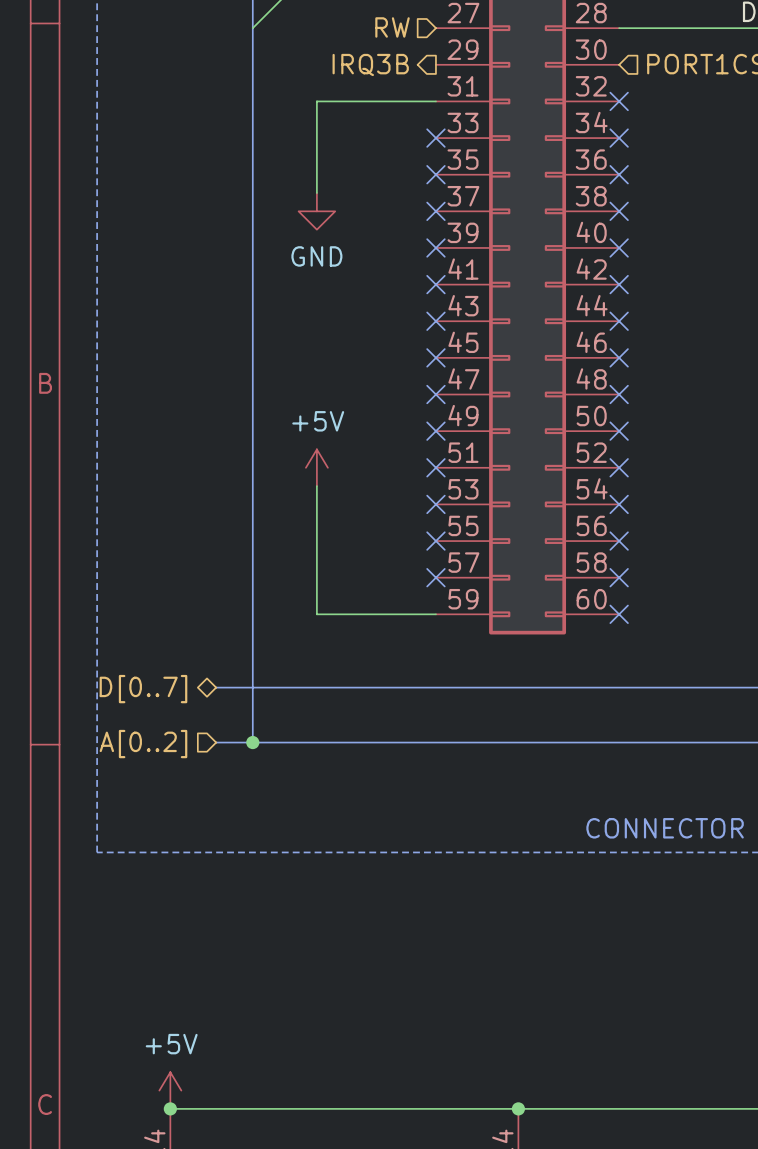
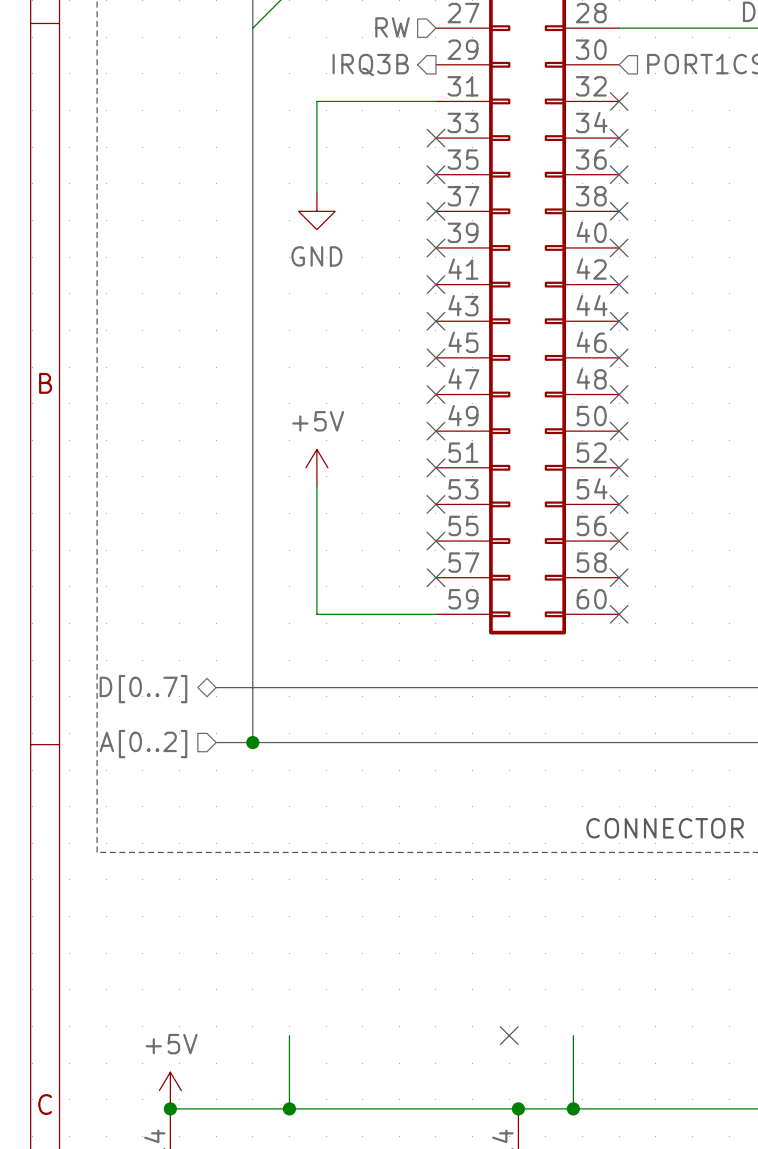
wire: none -> (289, 1035) (289, 1108)
no-connect mark: none -> (509, 1035)
wire: none -> (573, 1035) (573, 1108)
junction: none -> (289, 1108)
junction: none -> (573, 1108)

